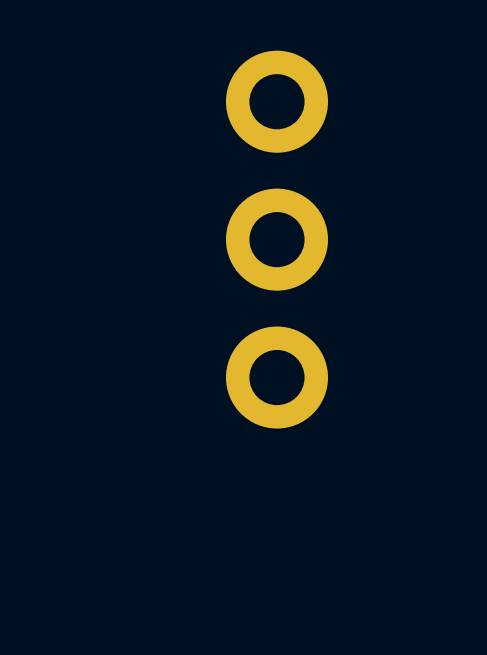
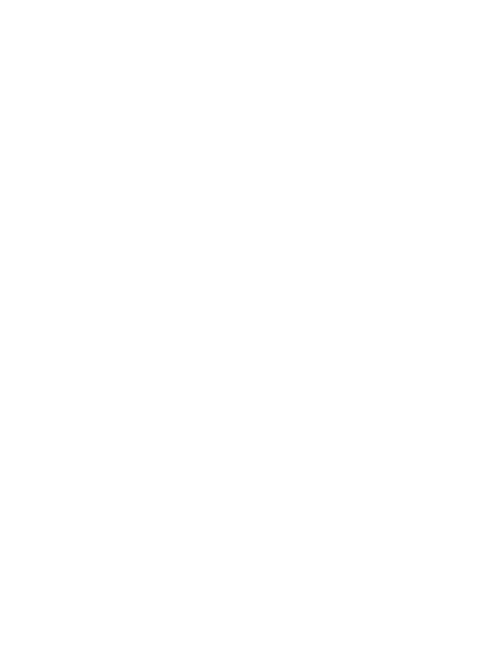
part: (276, 239) -> none

